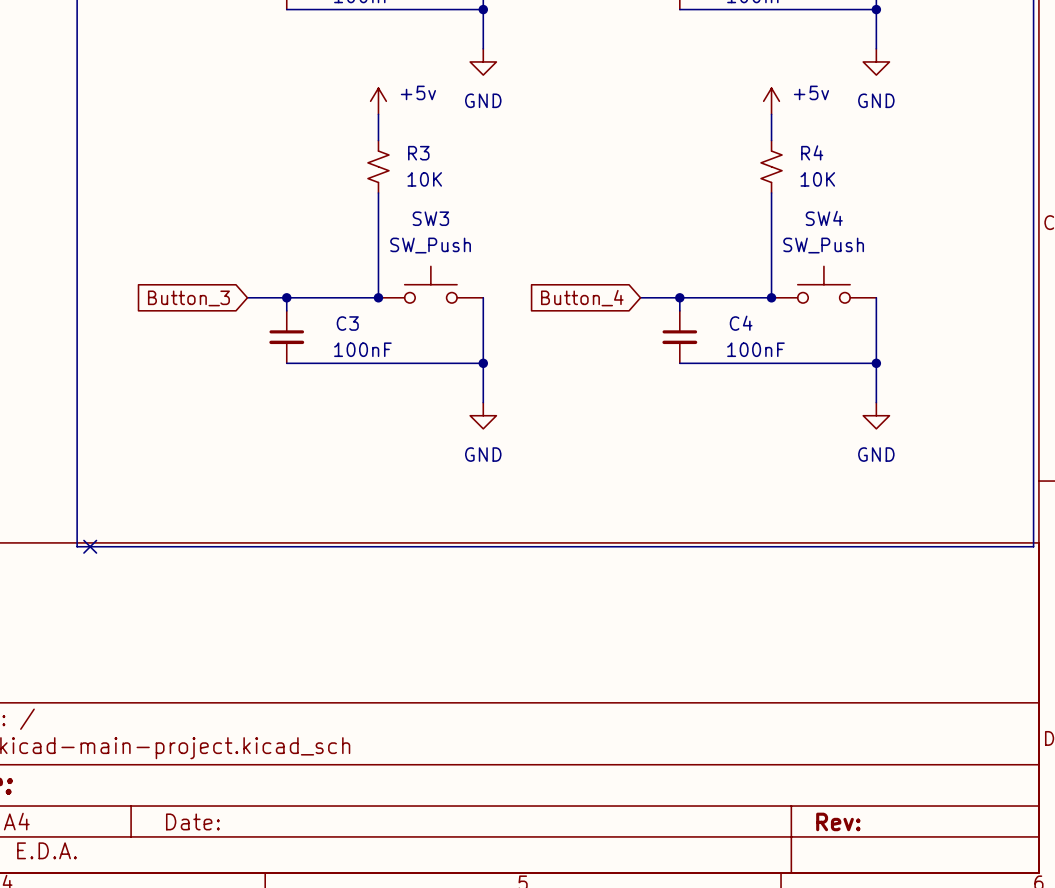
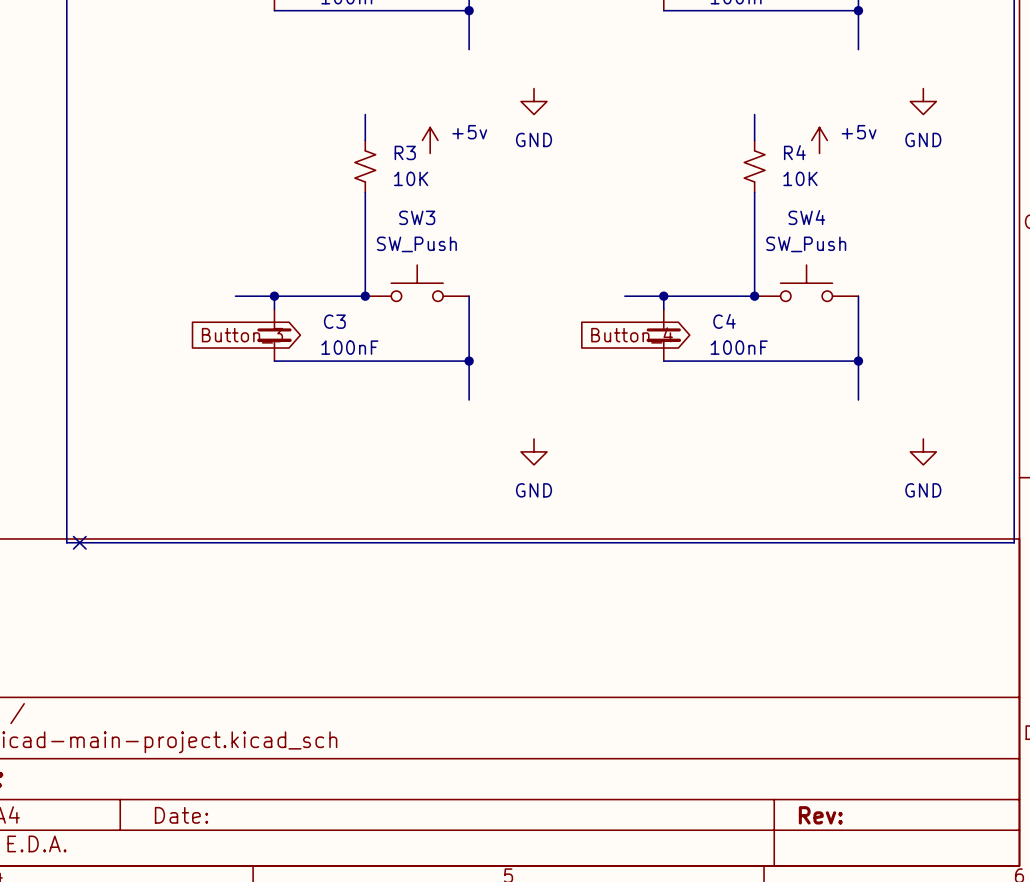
power symbol position: GND (483, 61) -> GND (534, 101)
power symbol position: GND (876, 61) -> GND (923, 101)
power symbol position: +5v (378, 101) -> +5v (430, 140)
power symbol position: +5v (771, 101) -> +5v (819, 140)
global label position: Button_3 (188, 298) -> Button_3 (242, 335)
global label position: Button_4 (582, 298) -> Button_4 (632, 335)
power symbol position: GND (483, 415) -> GND (534, 451)
power symbol position: GND (876, 415) -> GND (923, 451)

